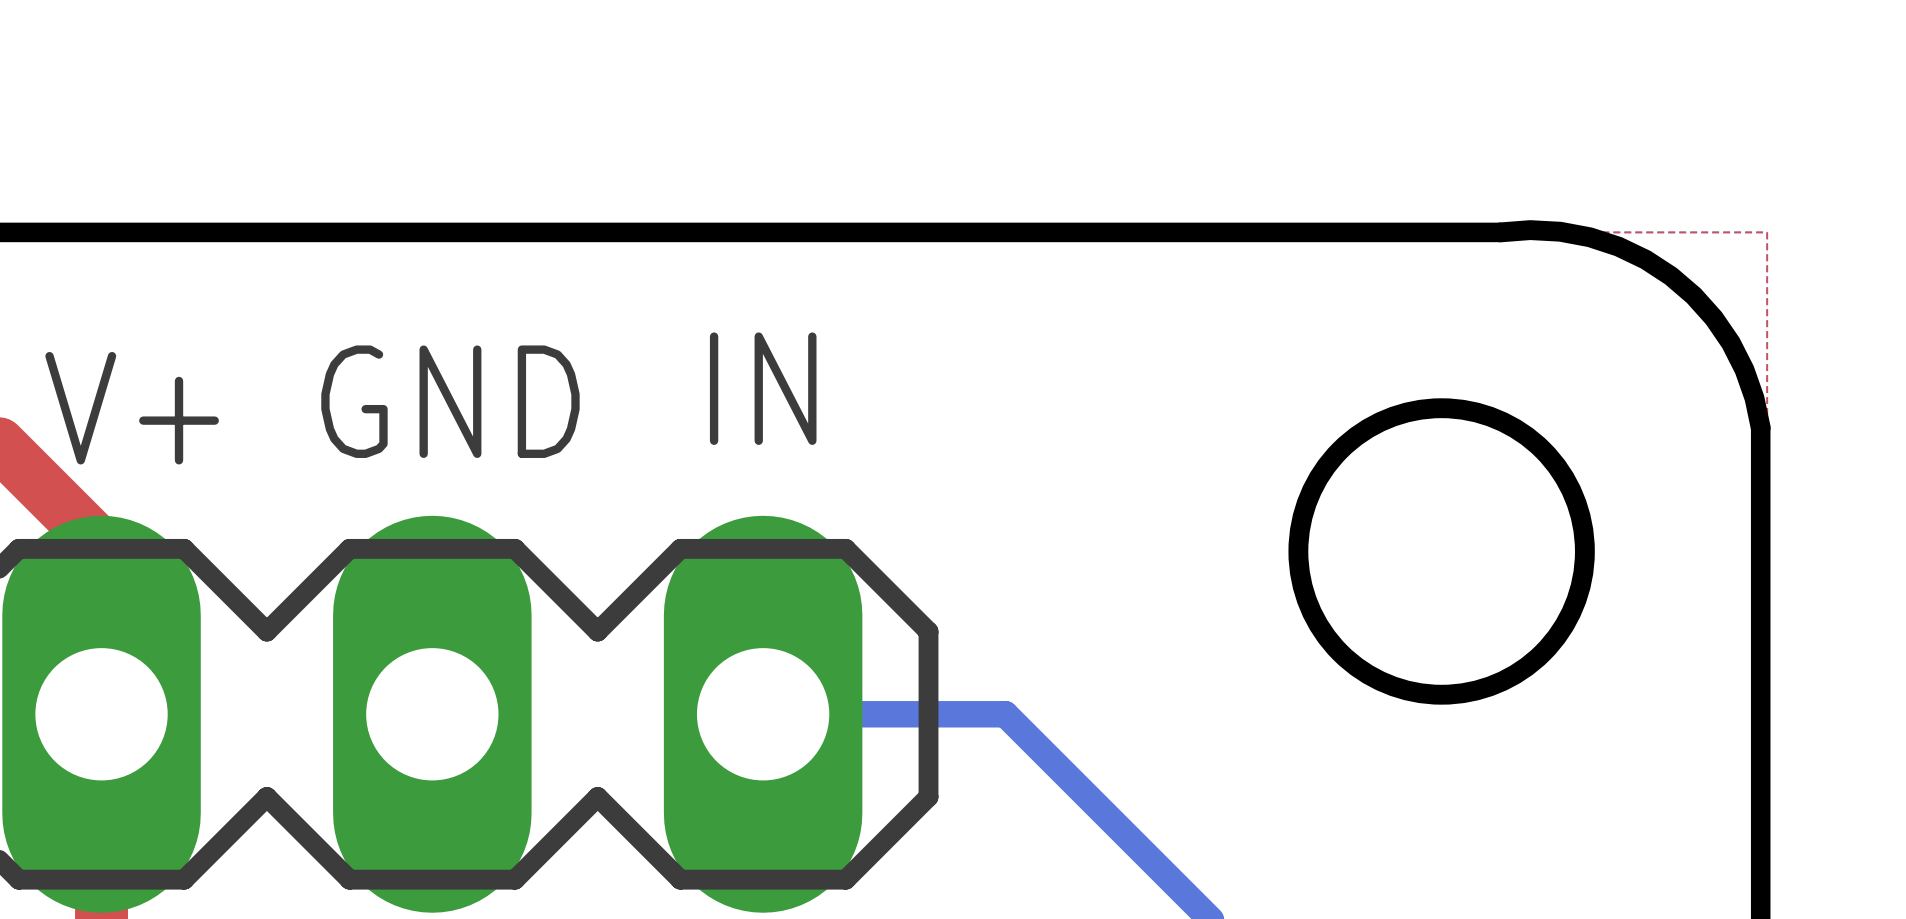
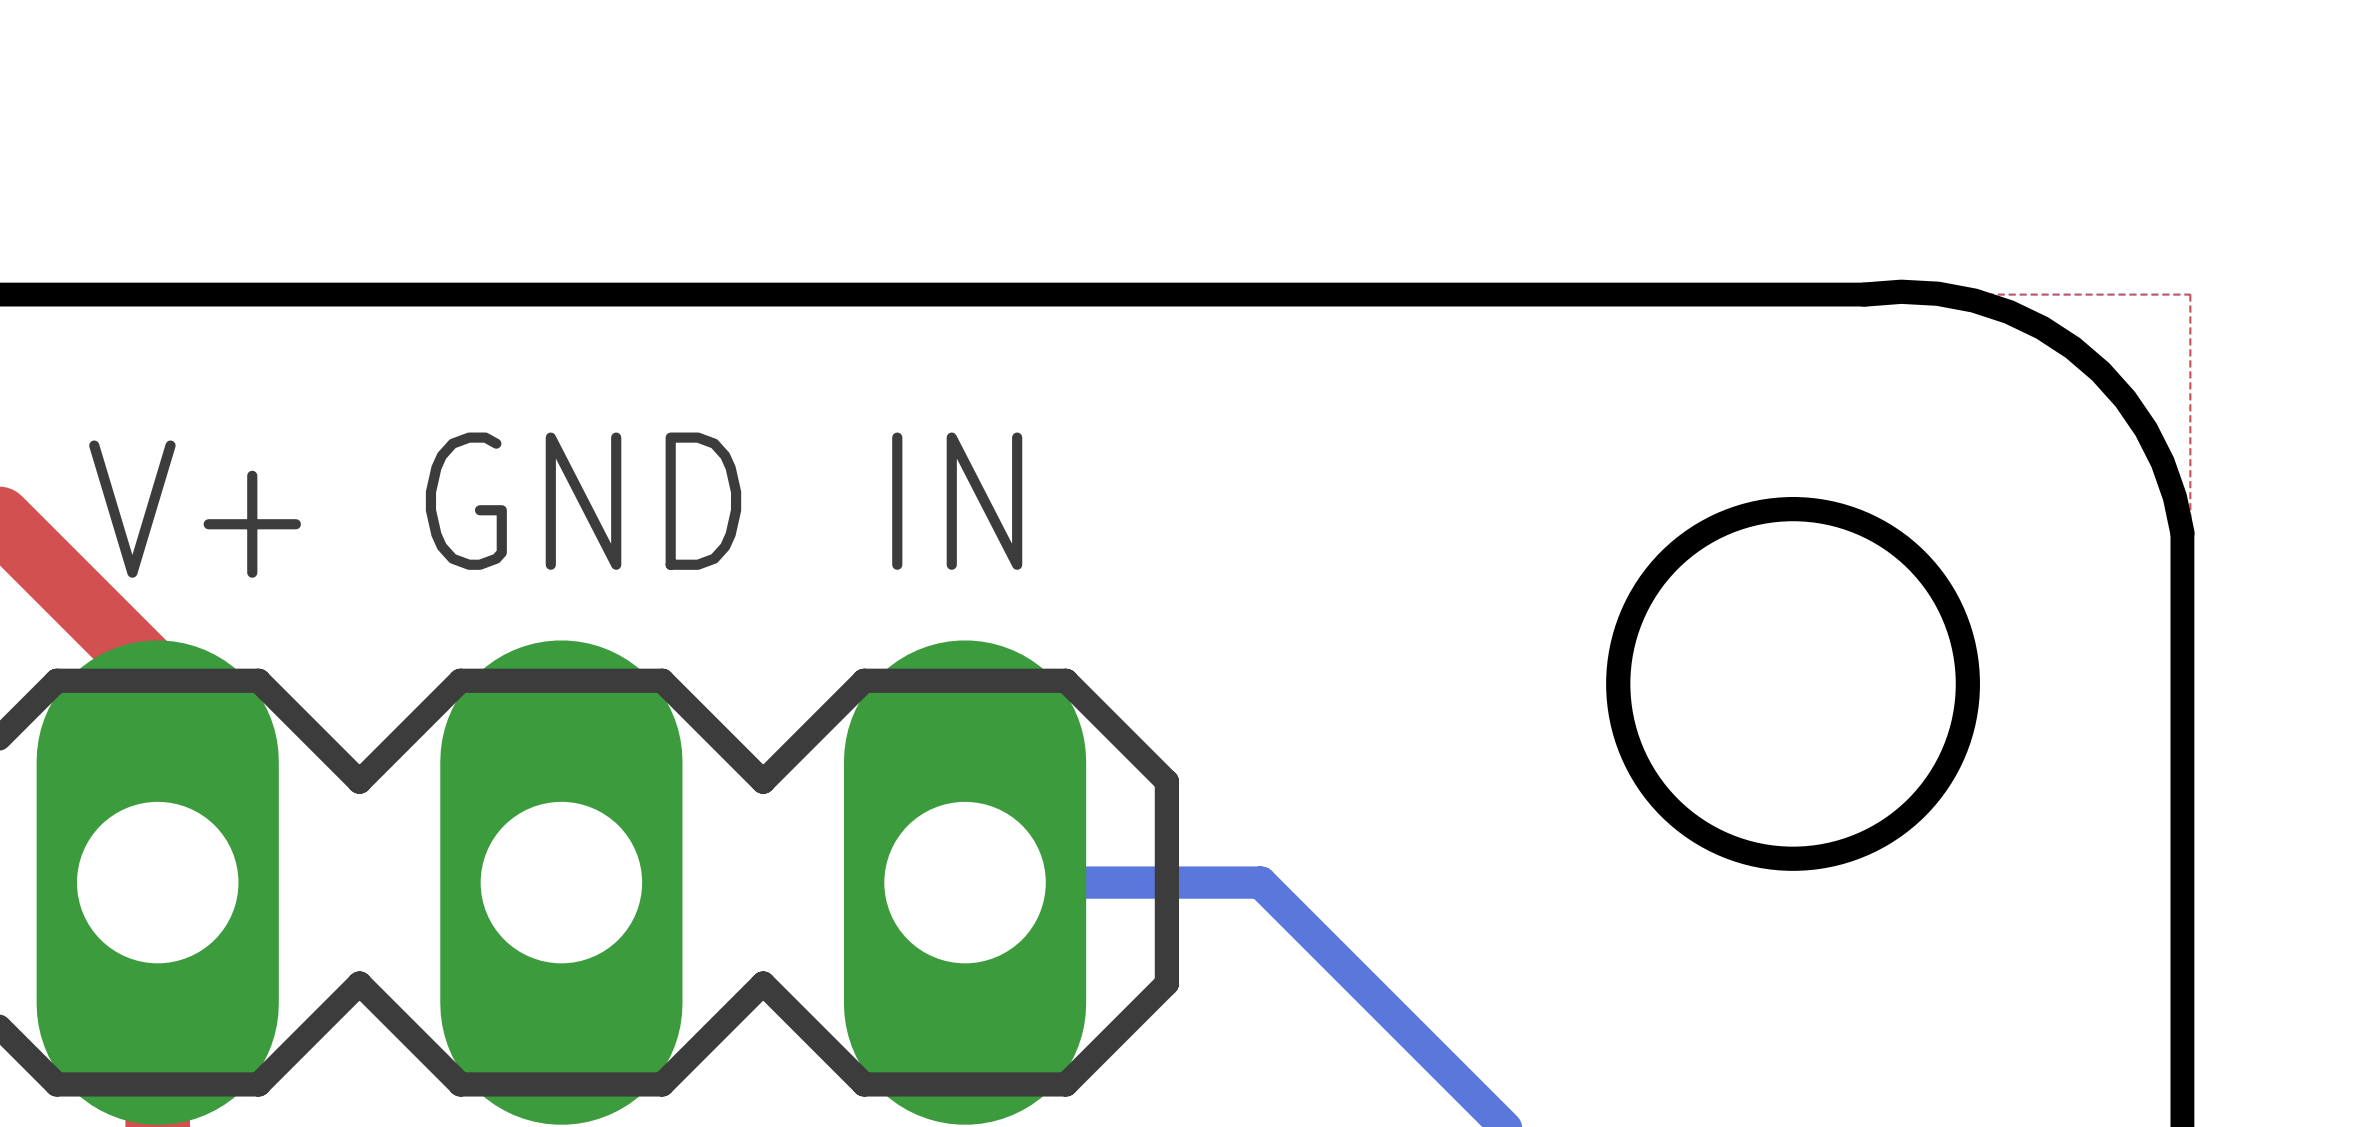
text position: IN (763, 388) -> IN (957, 501)

